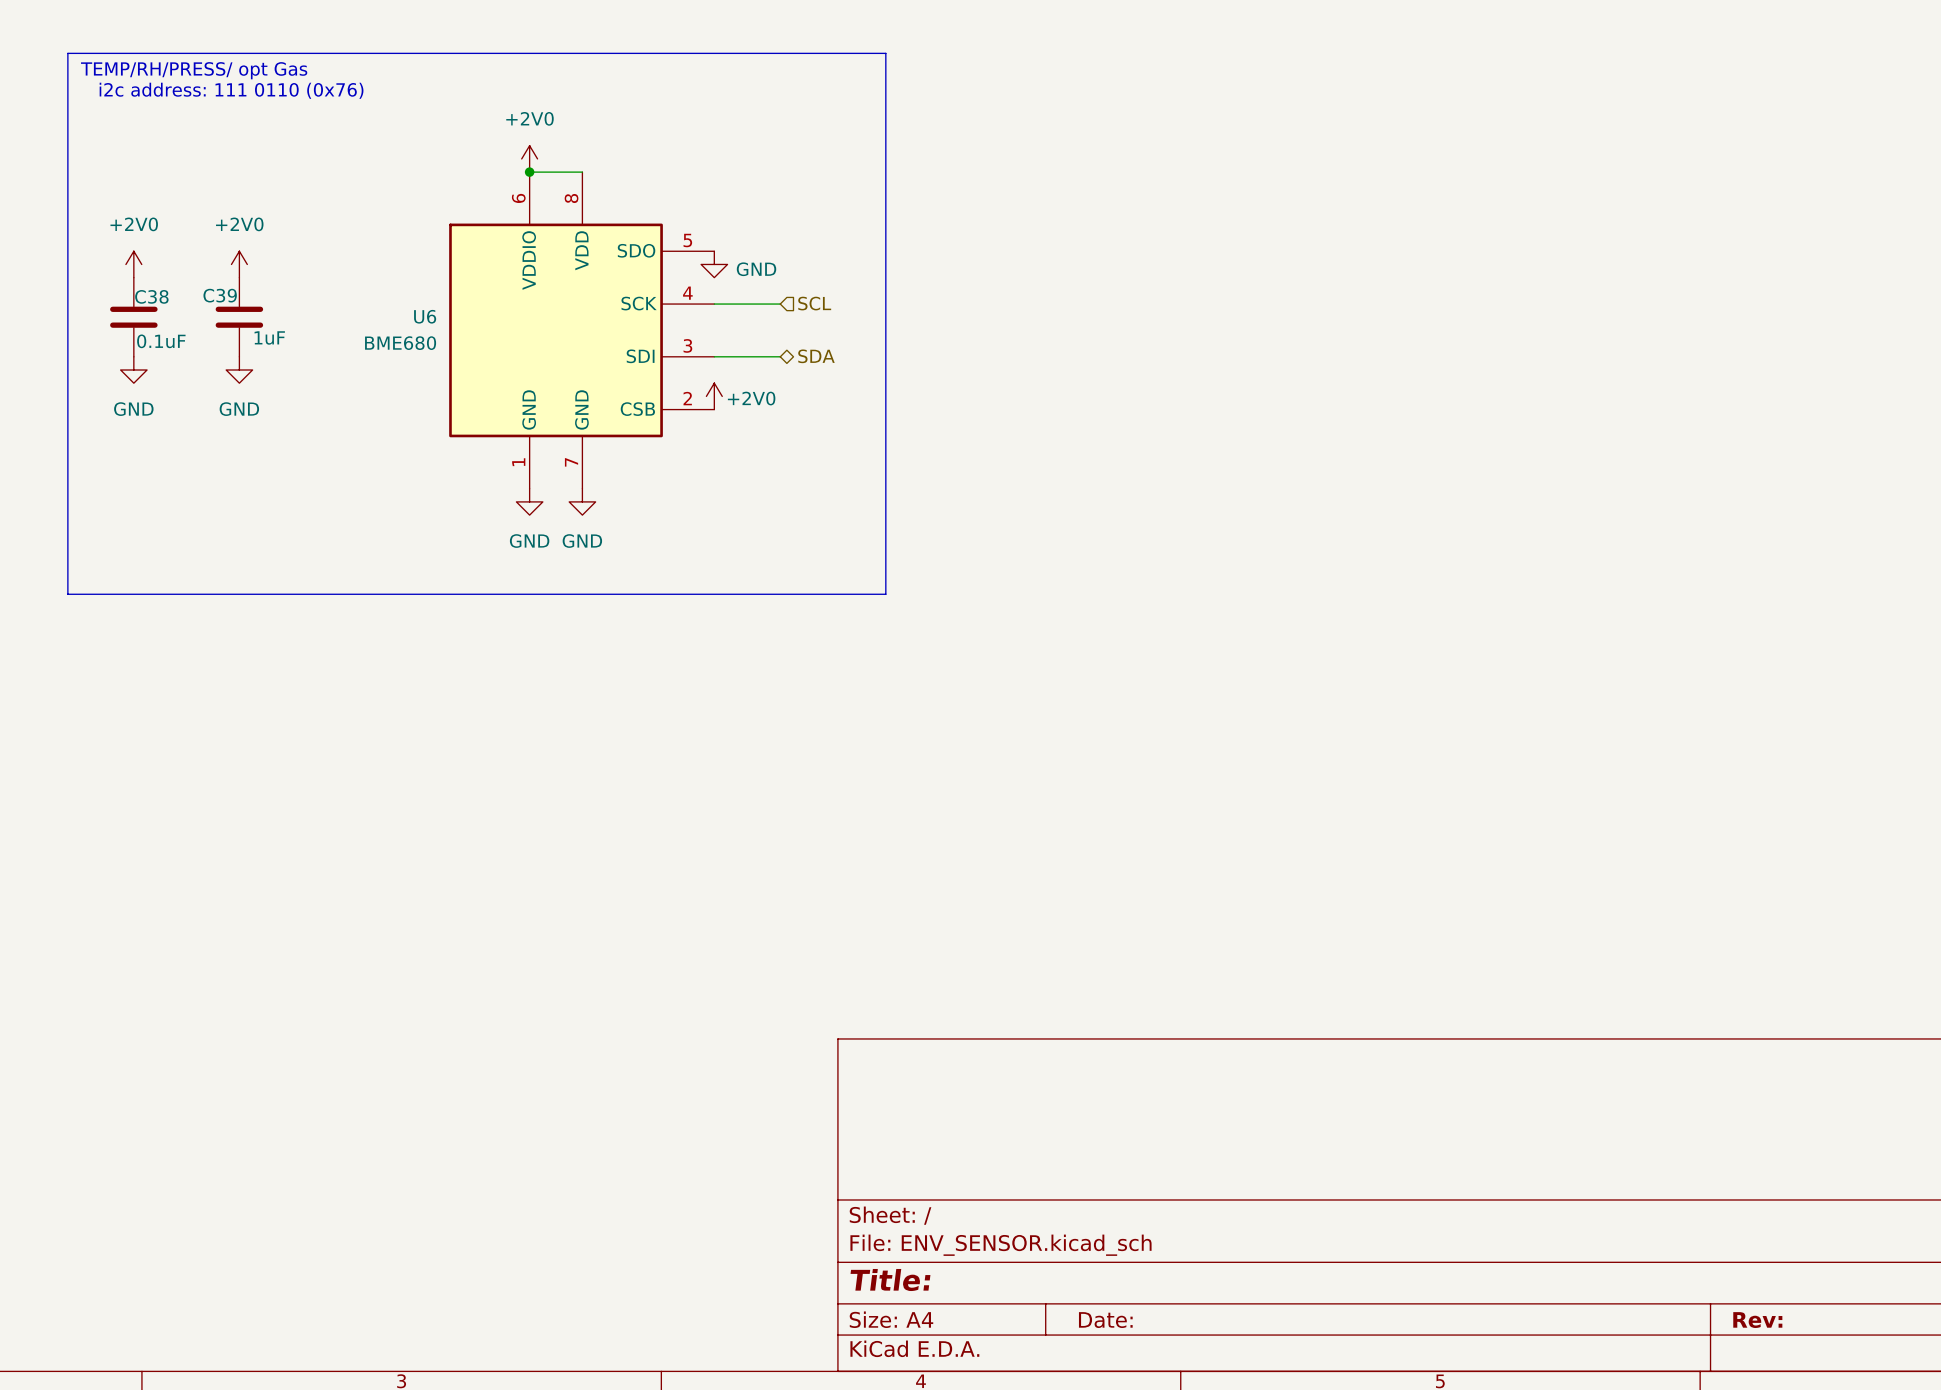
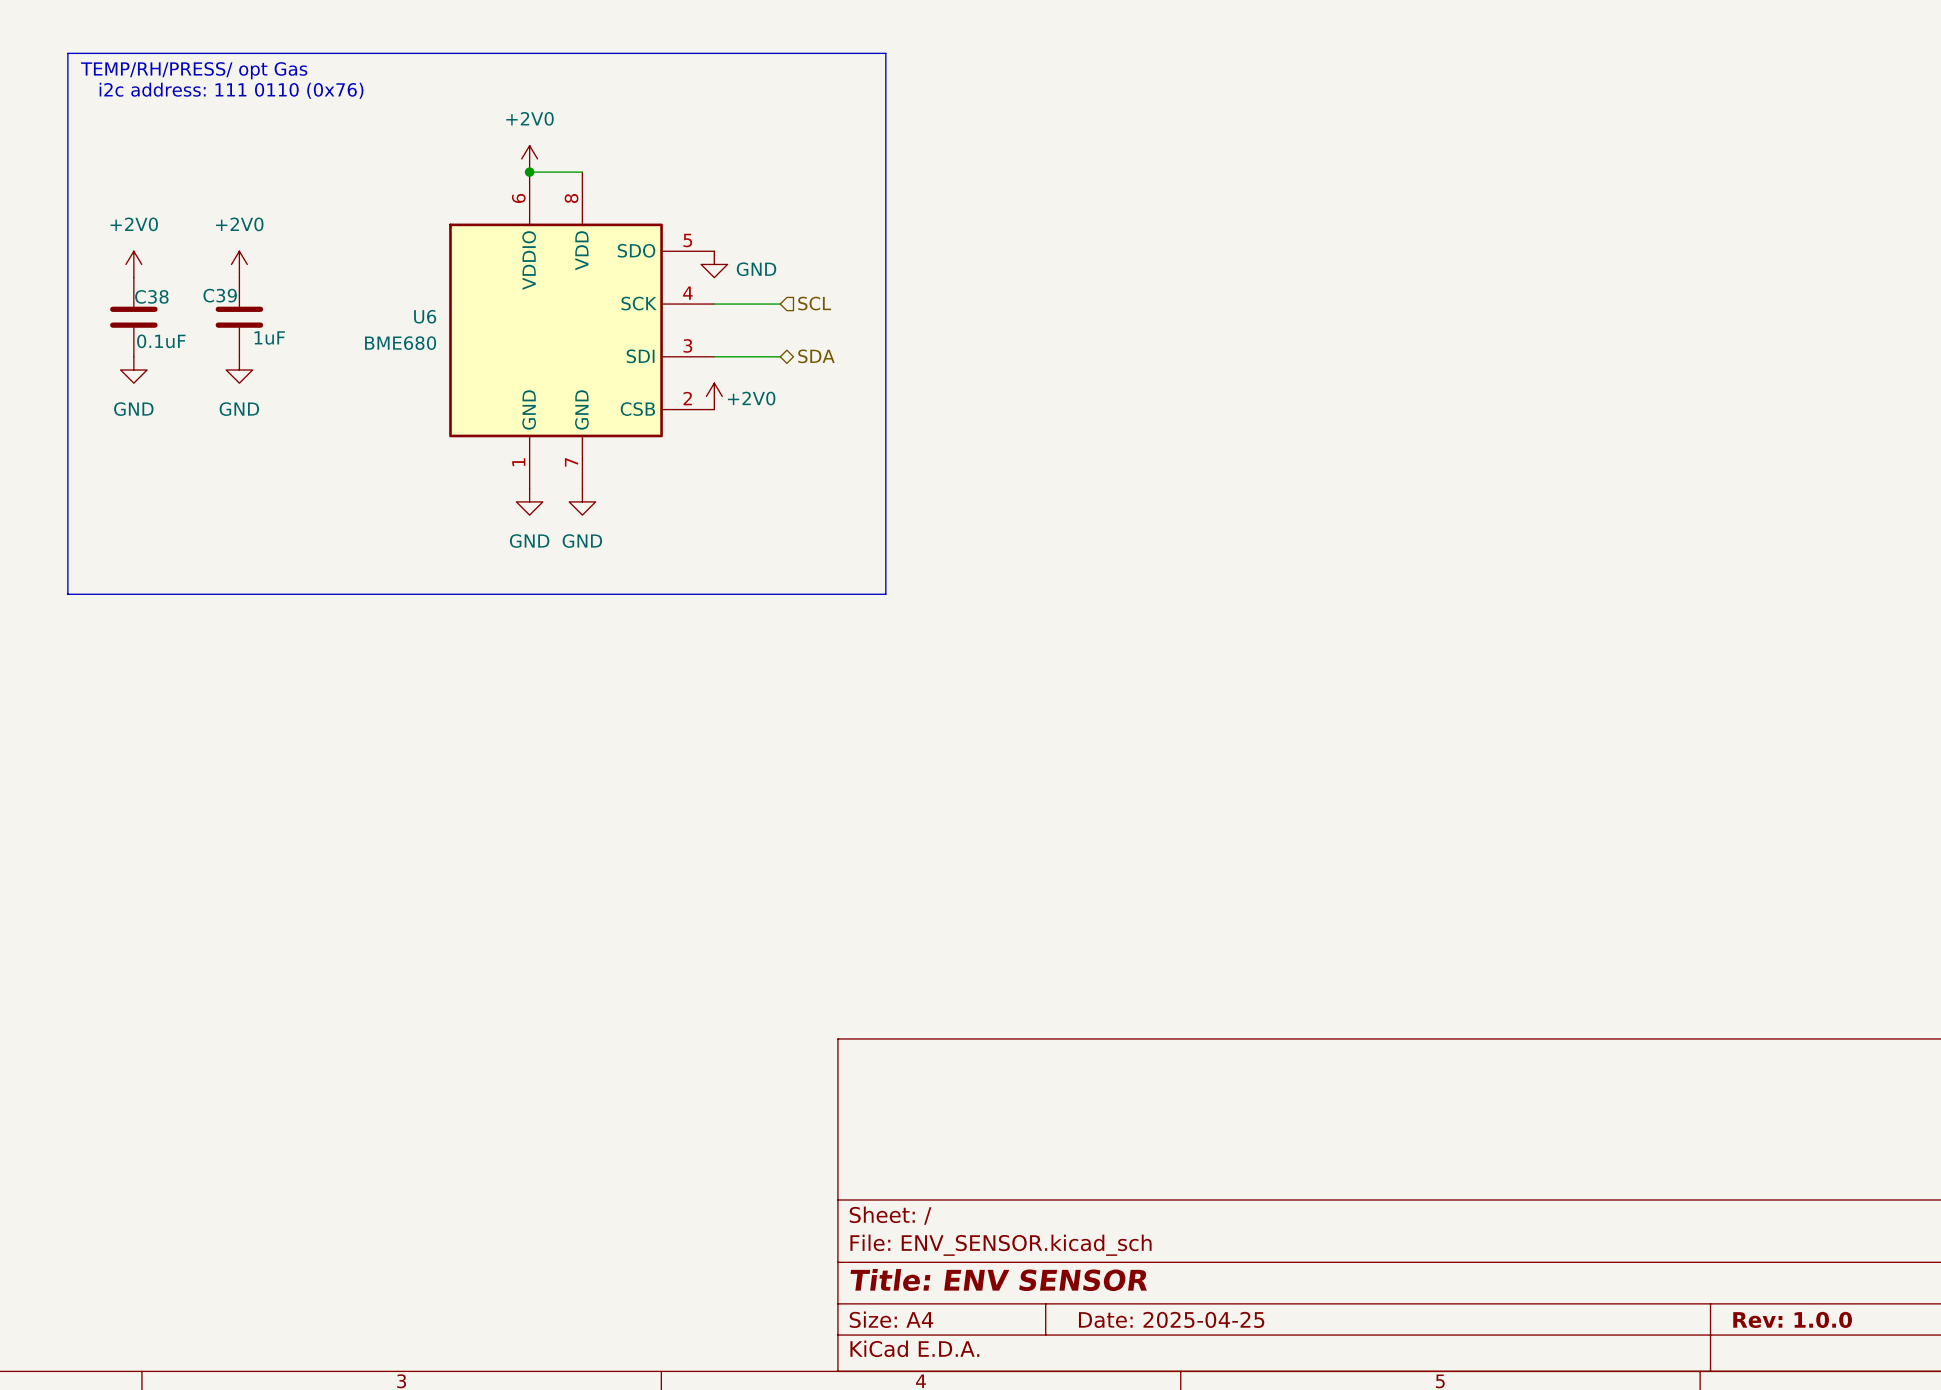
title block: Title: (890, 1280) -> Title: ENV SENSOR (998, 1280)
title block: Date: (1105, 1320) -> Date: 2025-04-25 (1171, 1319)
title block: Rev: (1757, 1320) -> Rev: 1.0.0 (1792, 1319)

